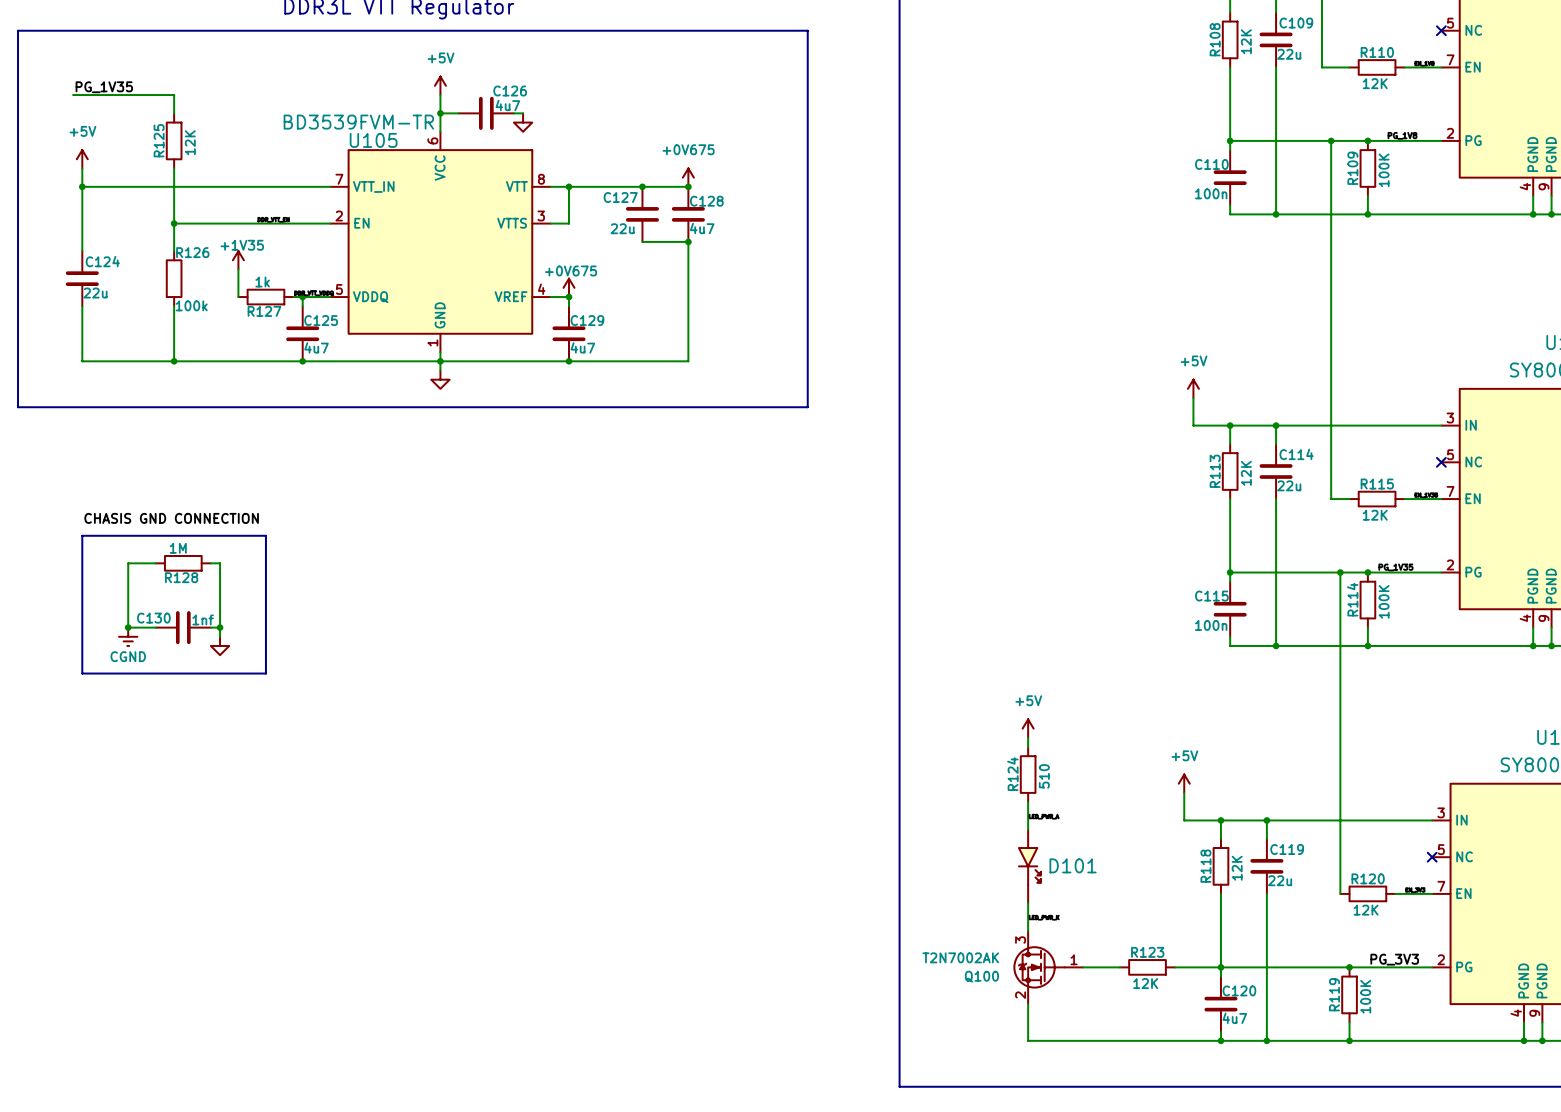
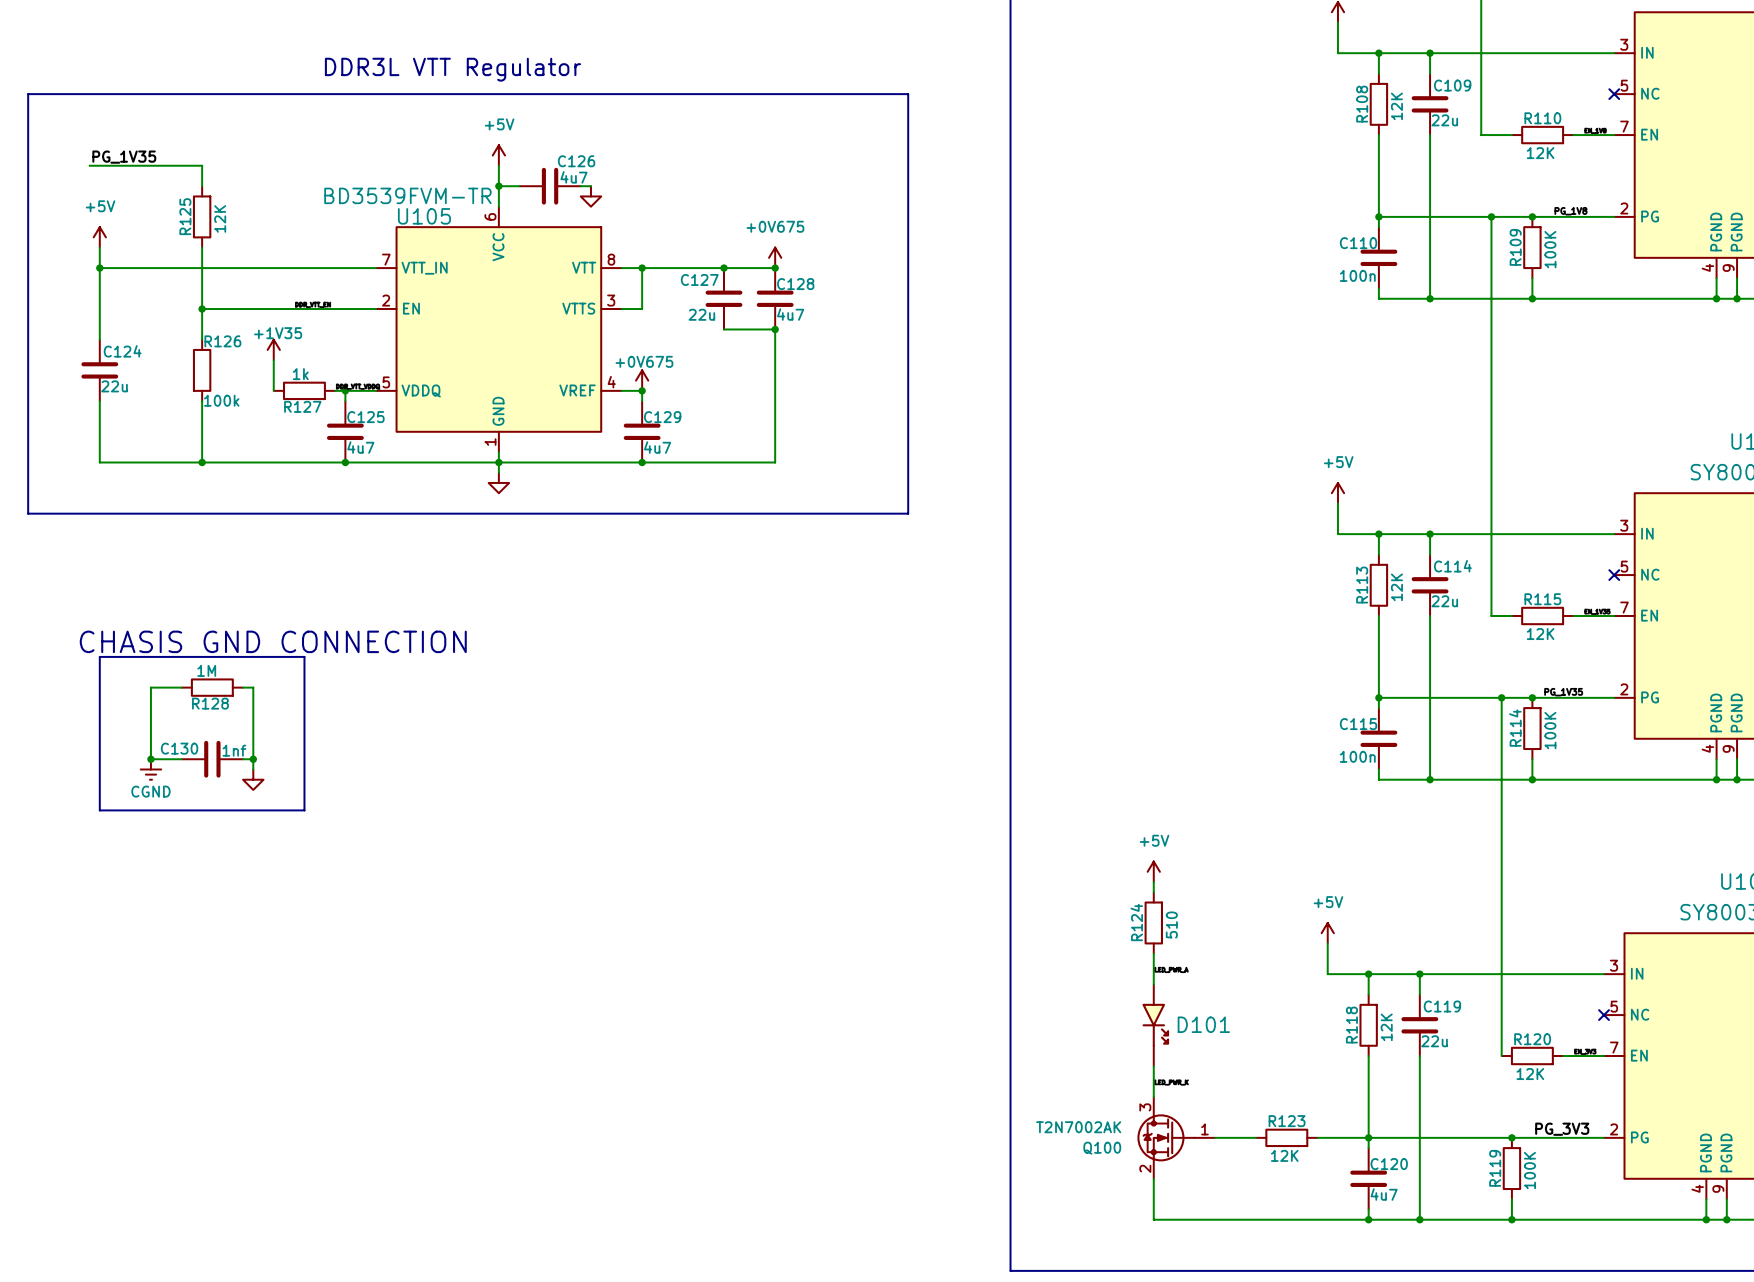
label: CHASIS GND CONNECTION (171, 518) -> none
text: none -> CHASIS GND CONNECTION (273, 641)

